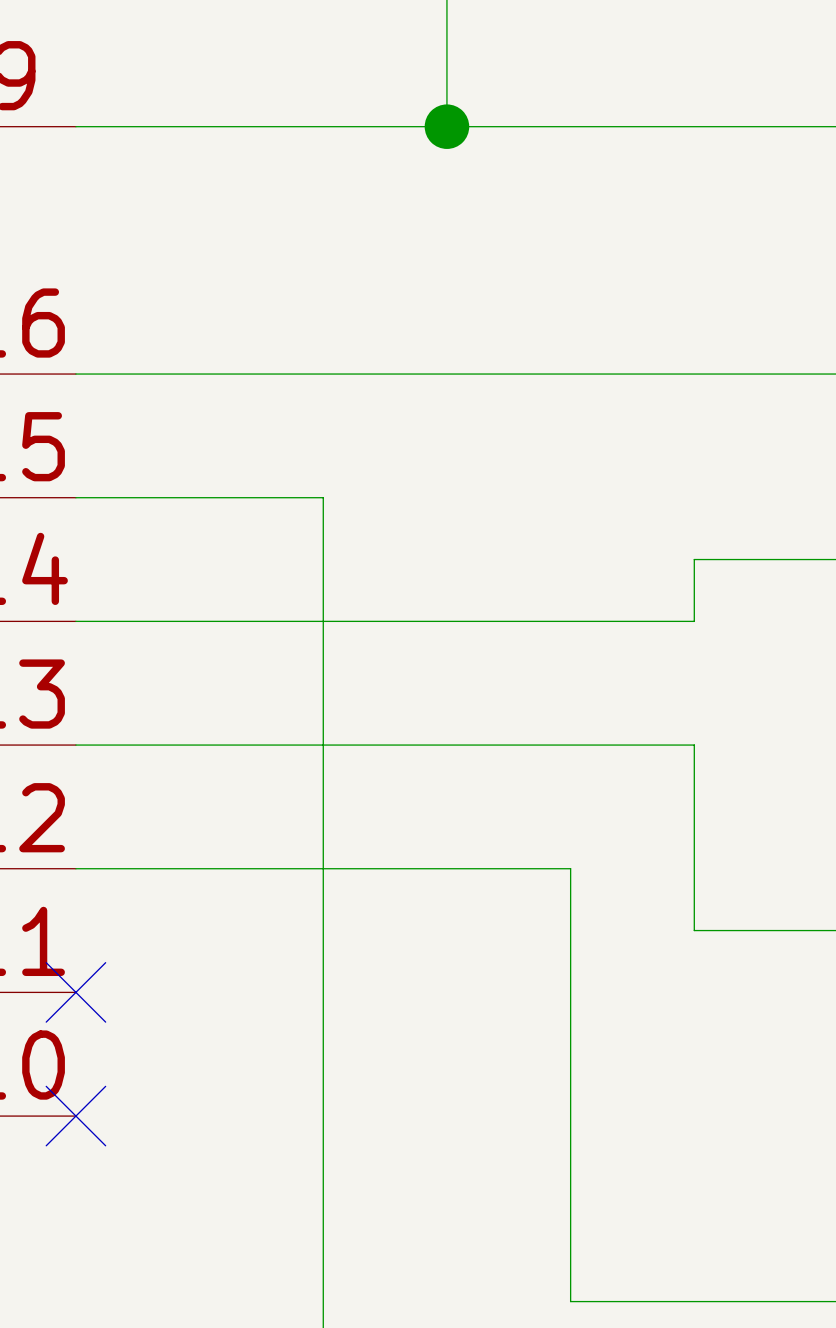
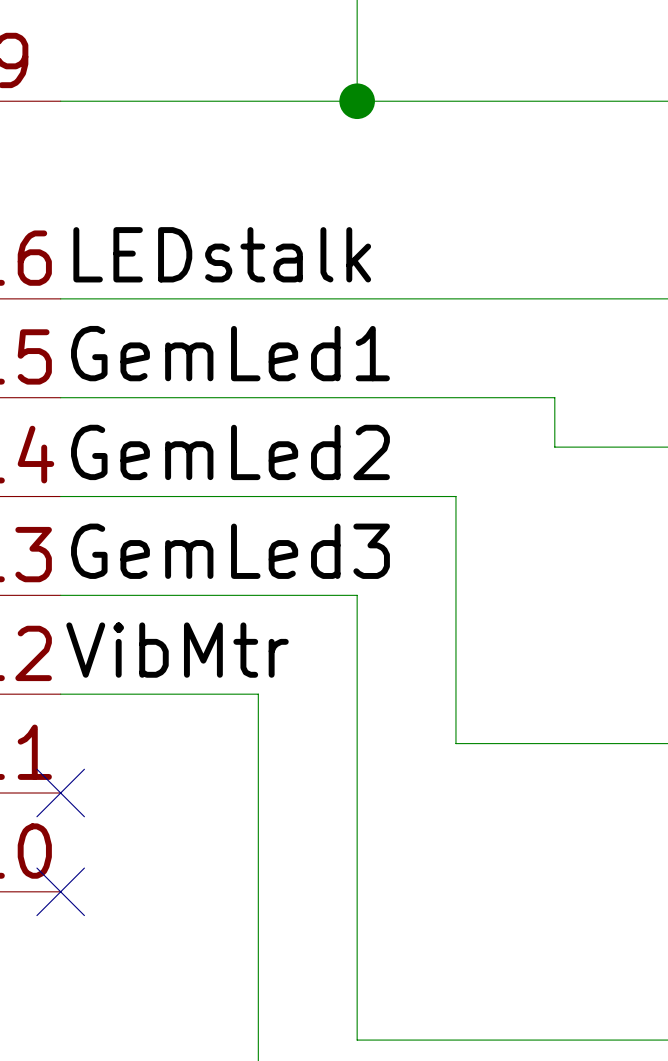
label: none -> LEDstalk (222, 254)
label: none -> GemLed1 (230, 353)
wire: (323, 497) (323, 868) (570, 868) -> (455, 496) (455, 694)
wire: (694, 559) (694, 621) (570, 621) -> (554, 447) (554, 397) (258, 397)
label: none -> GemLed2 (230, 452)
label: none -> GemLed3 (230, 551)
wire: (446, 745) (694, 745) (694, 930) -> (455, 743) (554, 743)
label: none -> VibMtr (177, 650)
wire: (570, 930) (570, 1301) -> (357, 595) (357, 1040) (455, 1040)

